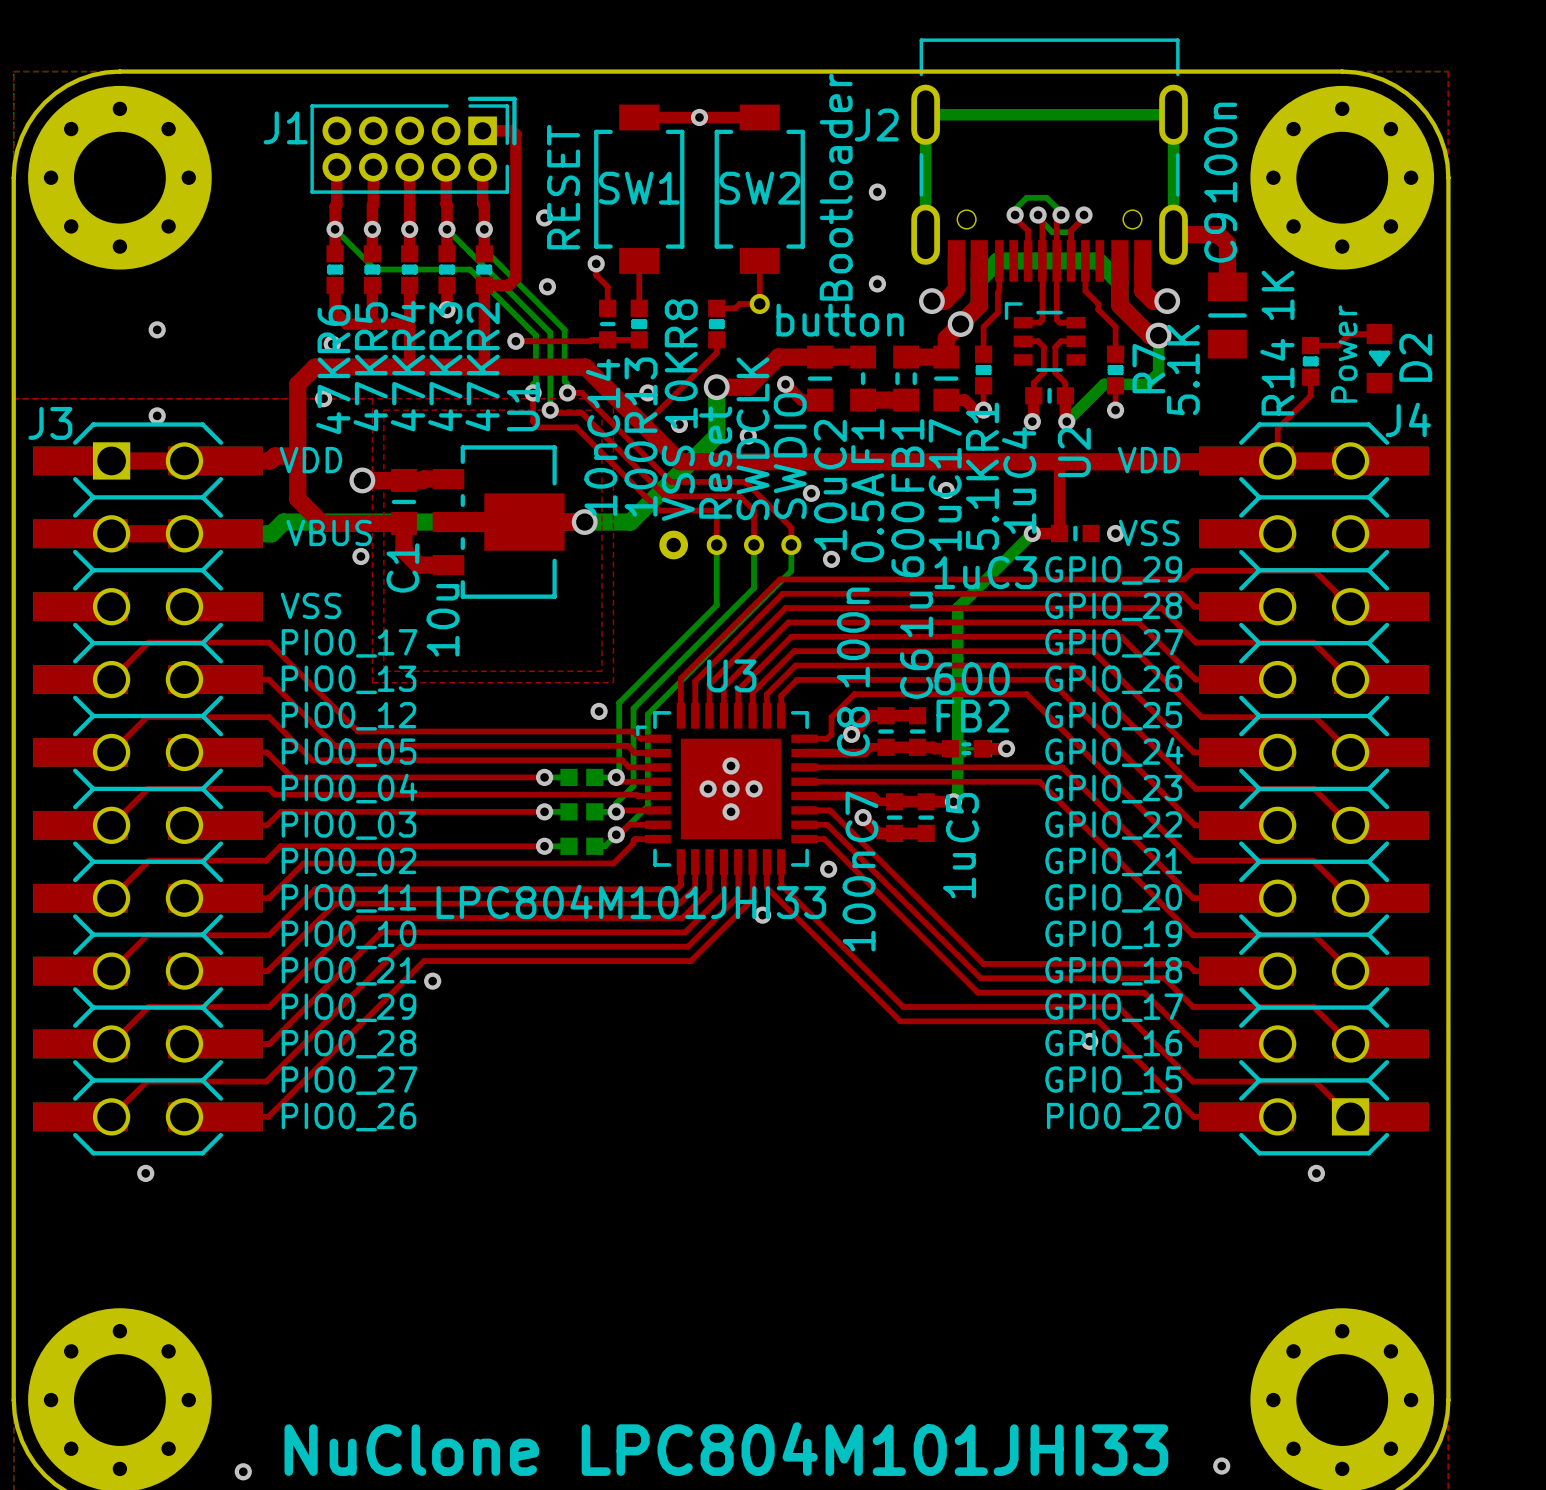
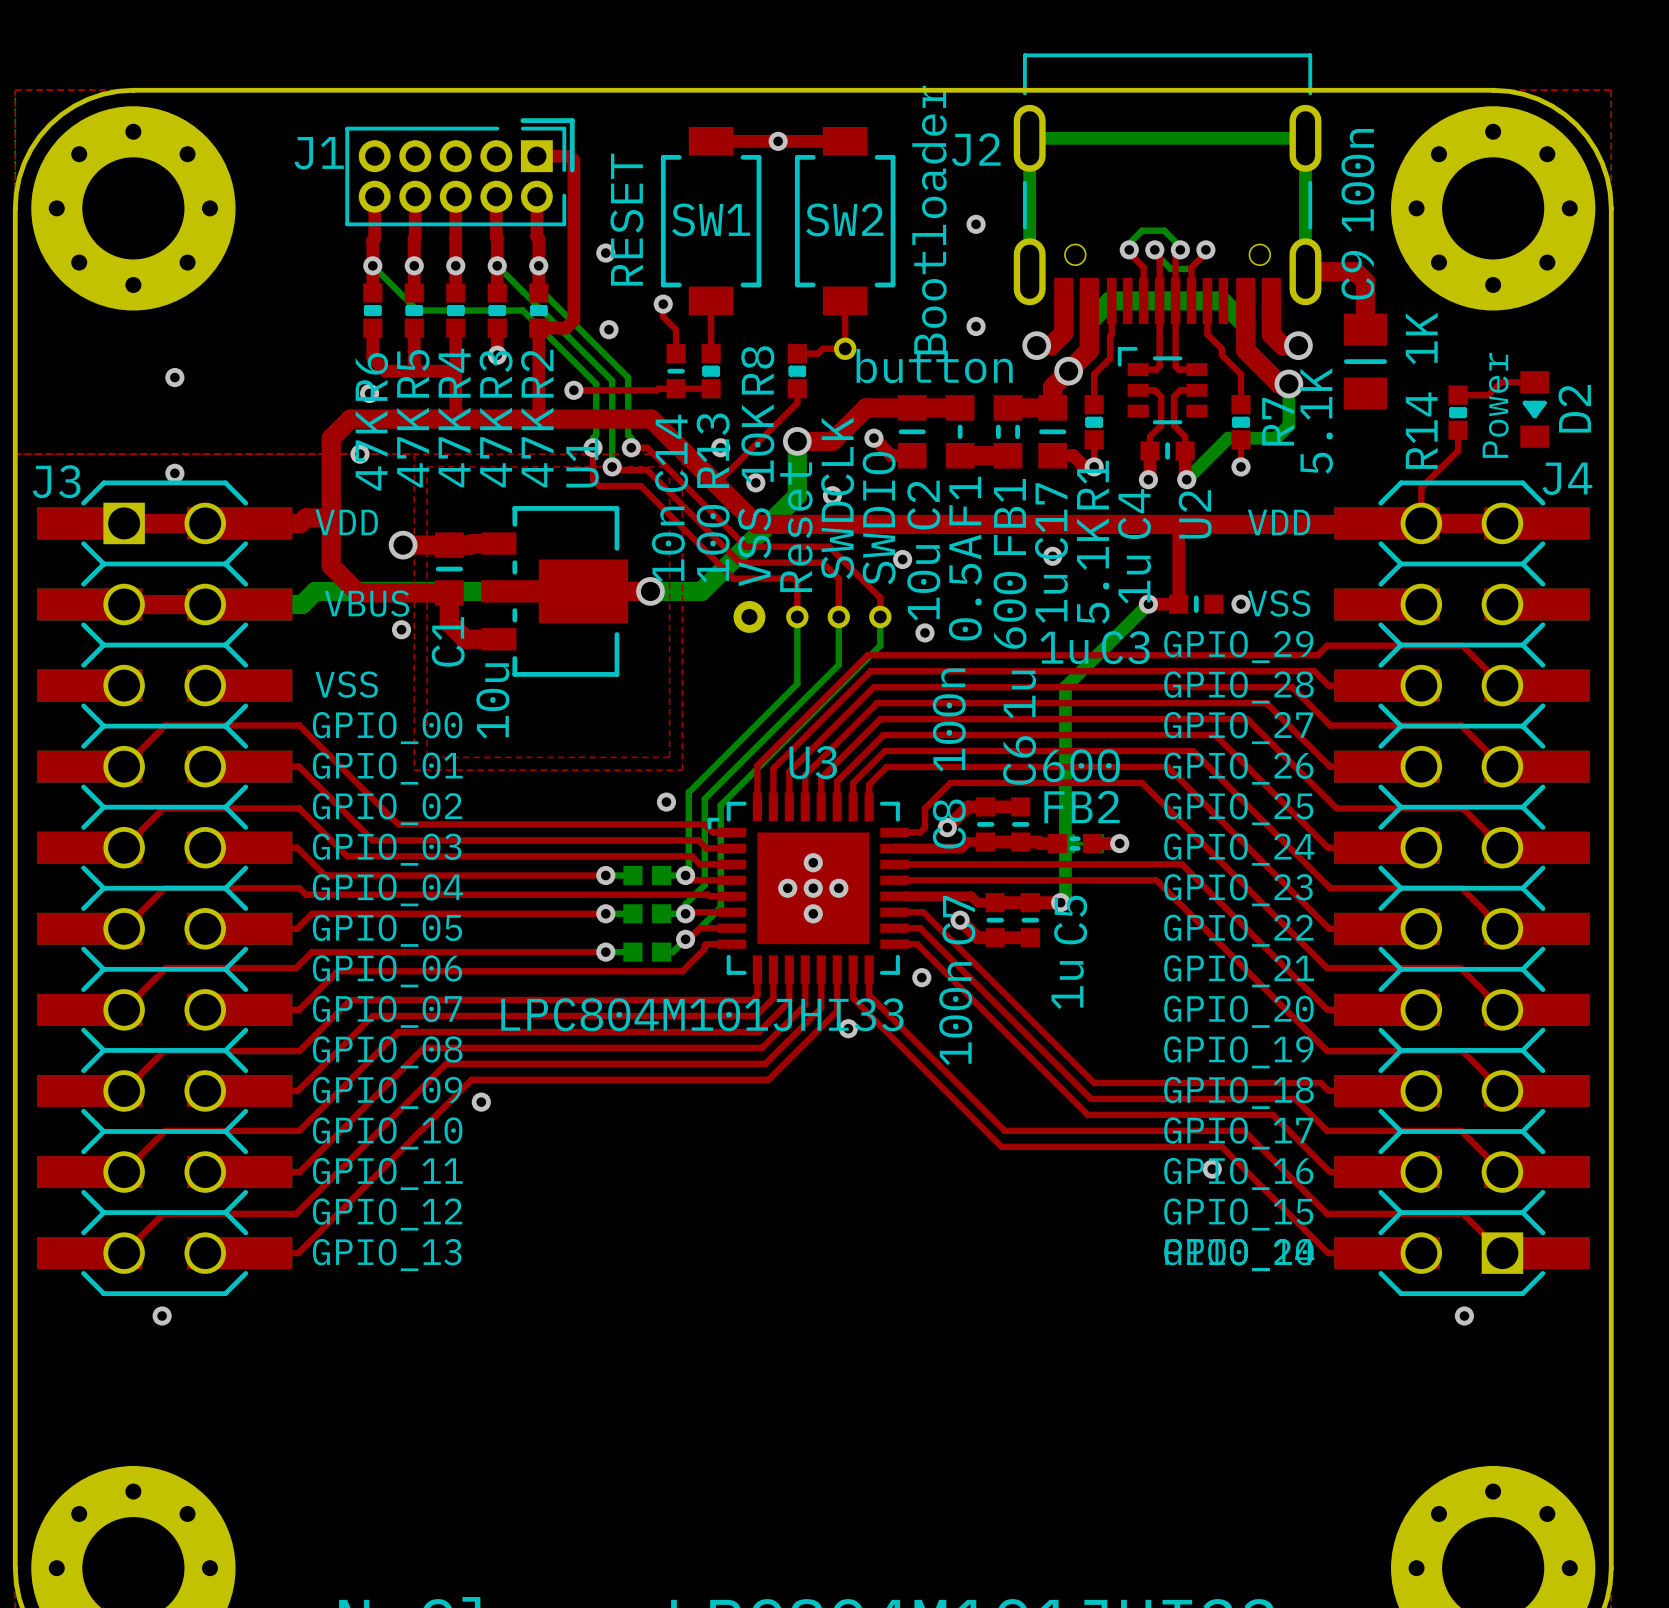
J3 footprint: [33, 422, 263, 1156] -> [36, 480, 293, 1297]
J4 footprint: [1199, 422, 1429, 1156] -> [1334, 480, 1590, 1297]

